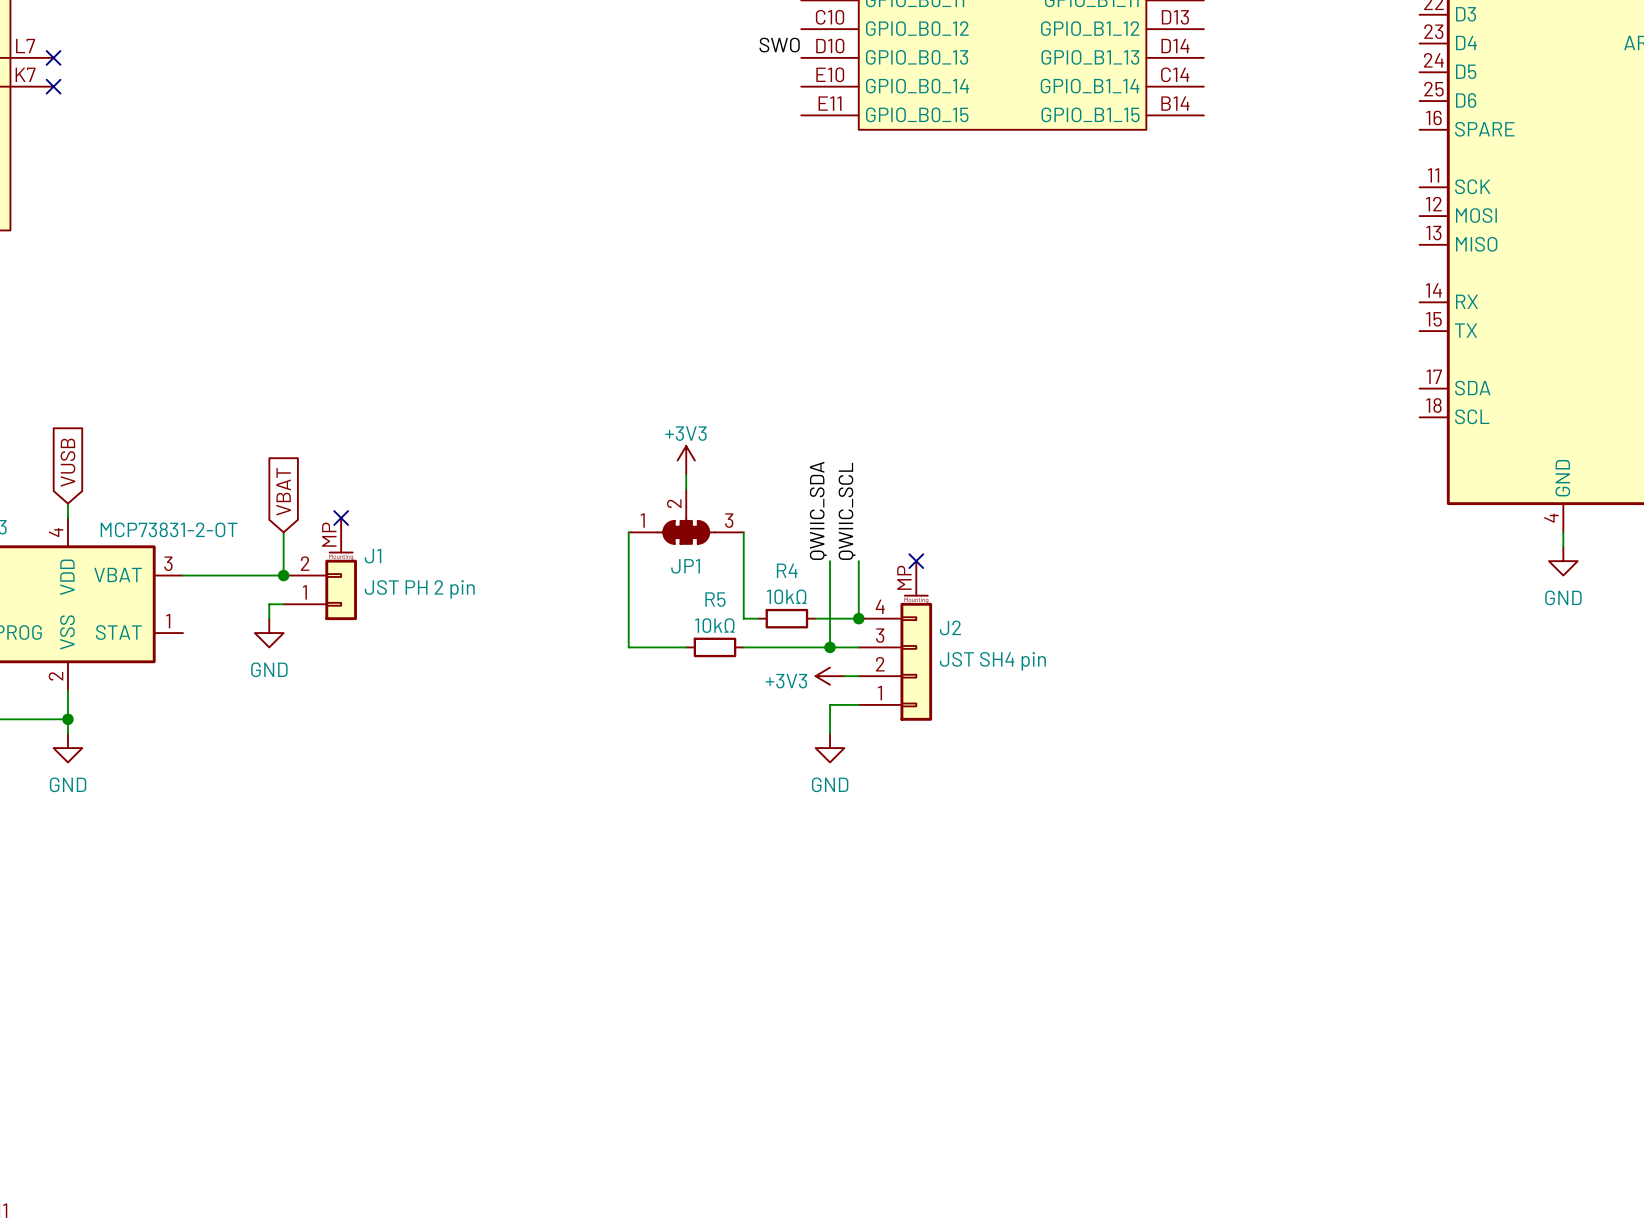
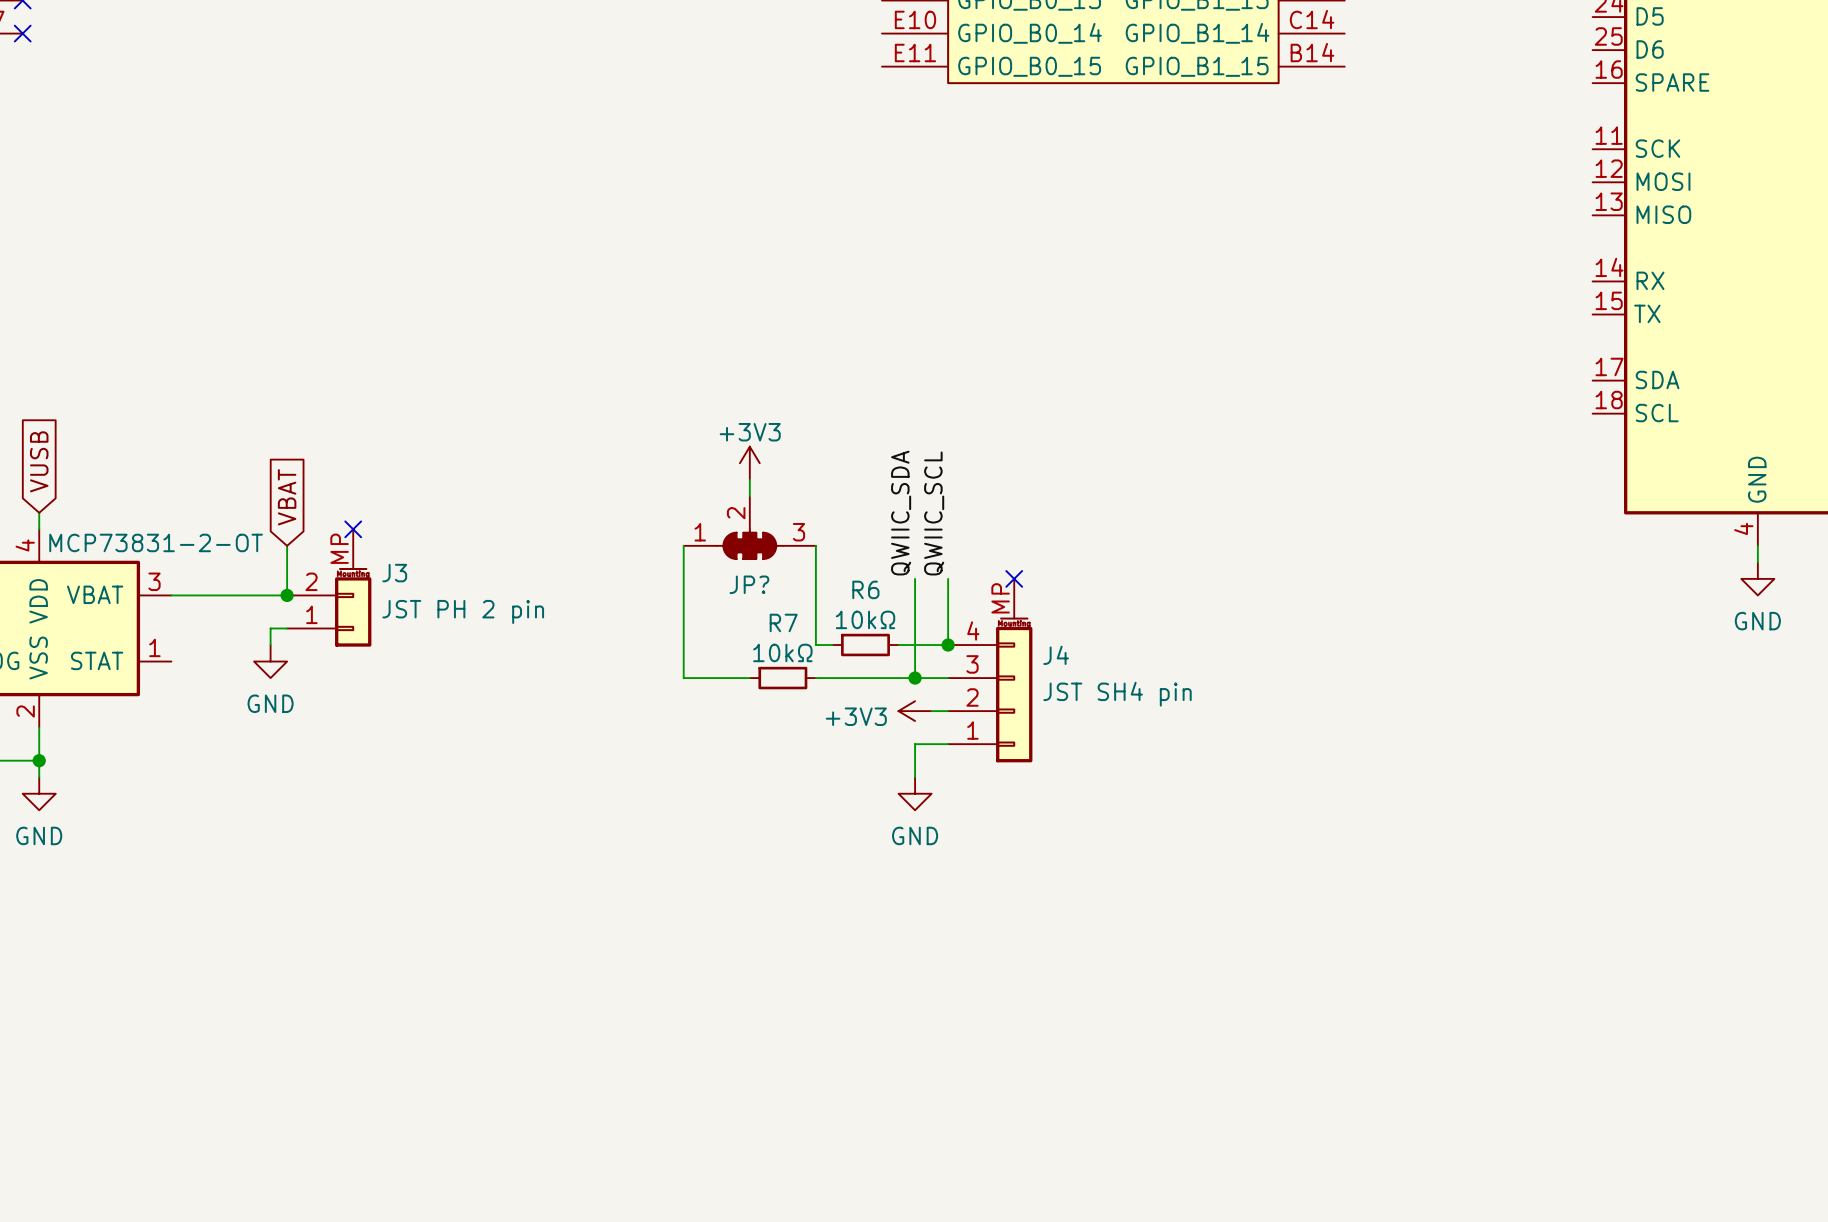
J1 name: J1 (373, 556) -> J3 (394, 573)
JP1 name: JP1 (685, 566) -> JP? (749, 584)
R4 name: R4 (787, 570) -> R6 (865, 589)
R5 name: R5 (715, 599) -> R7 (783, 622)
J2 name: J2 (950, 627) -> J4 (1056, 655)

